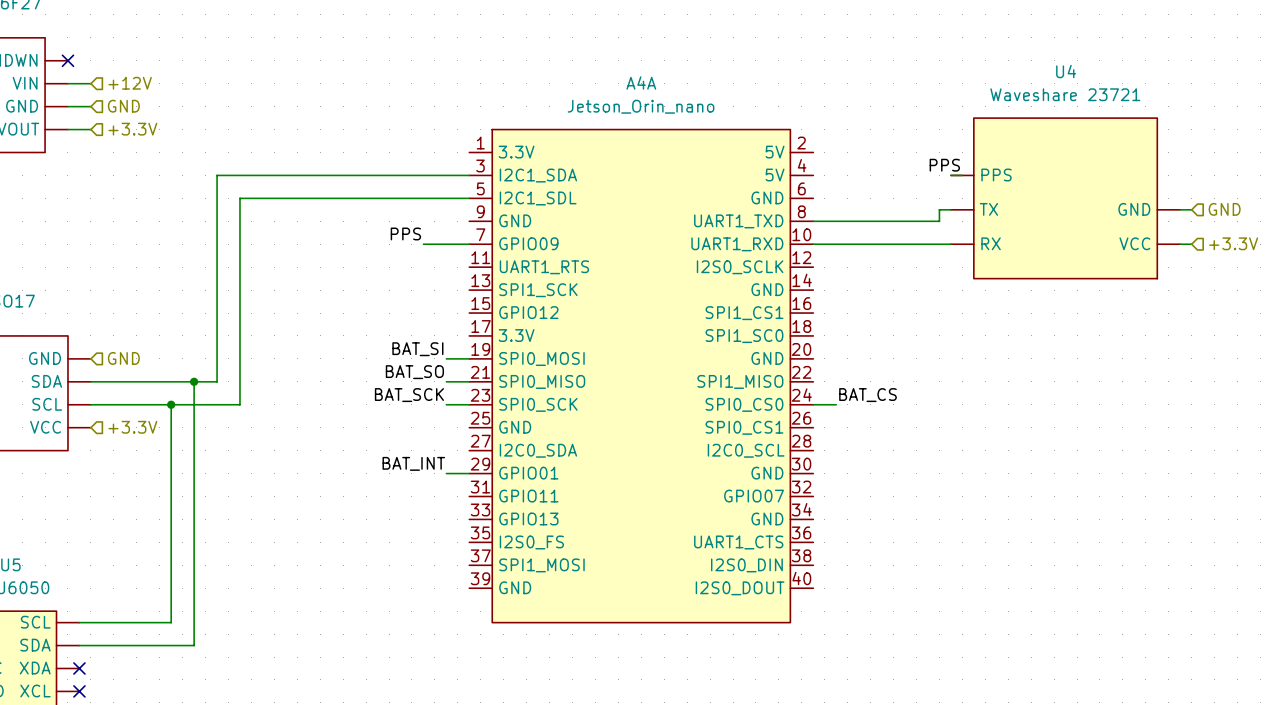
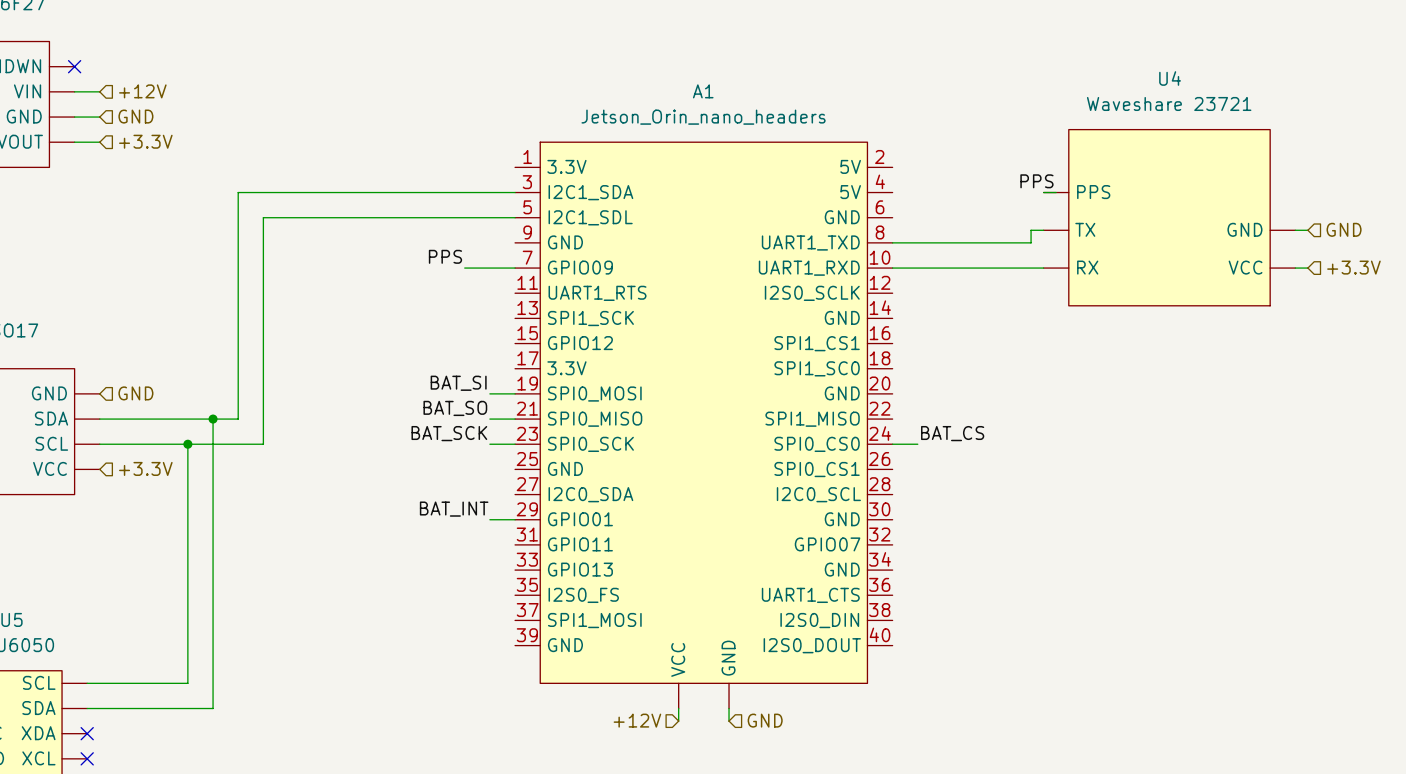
A4A: Jetson_Orin_nano (641, 376) -> none
A1: none -> Jetson_Orin_nano_headers (703, 425)
wire: none -> (678, 708) (678, 721)
wire: none -> (729, 708) (729, 721)
hierarchical label: none -> +12V (637, 720)
hierarchical label: none -> GND (765, 720)

